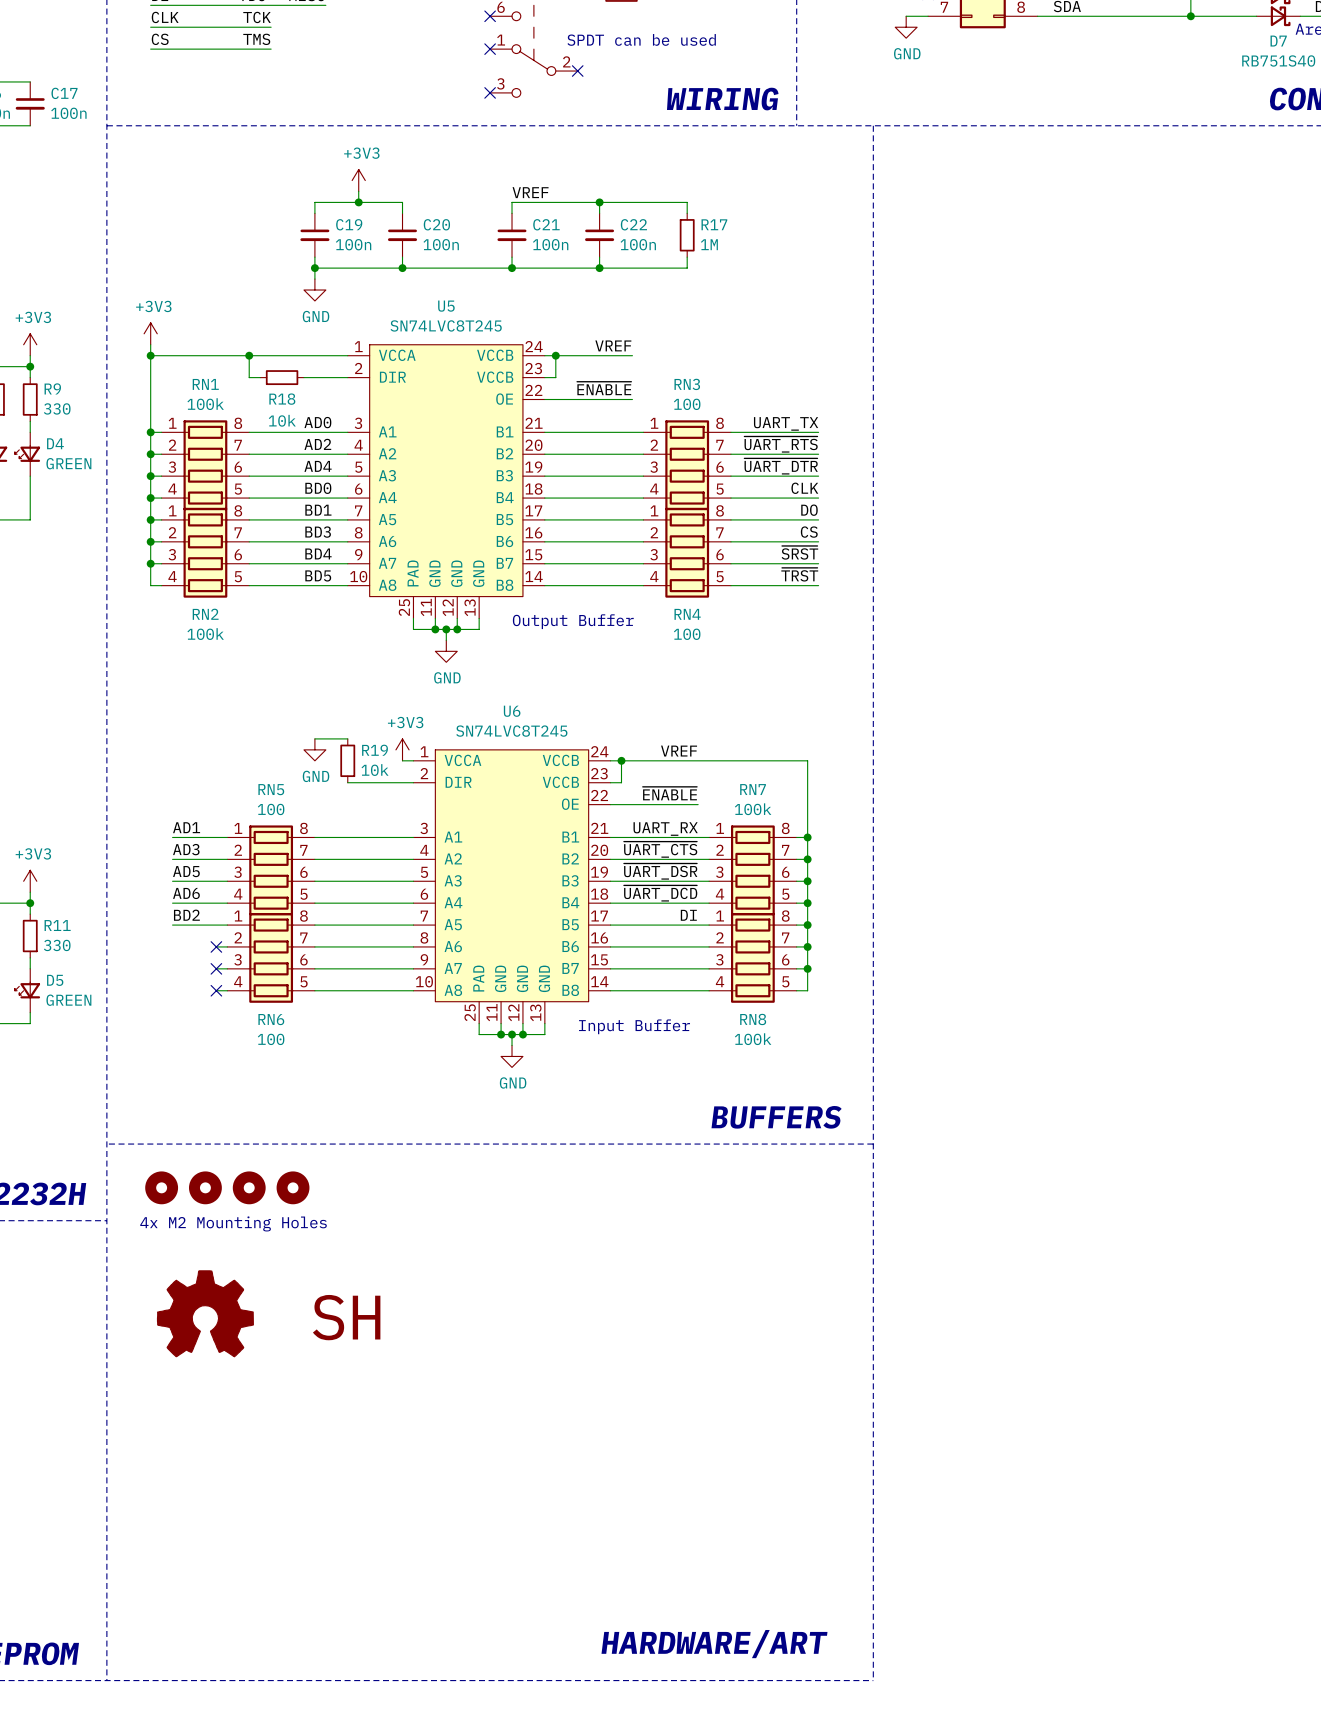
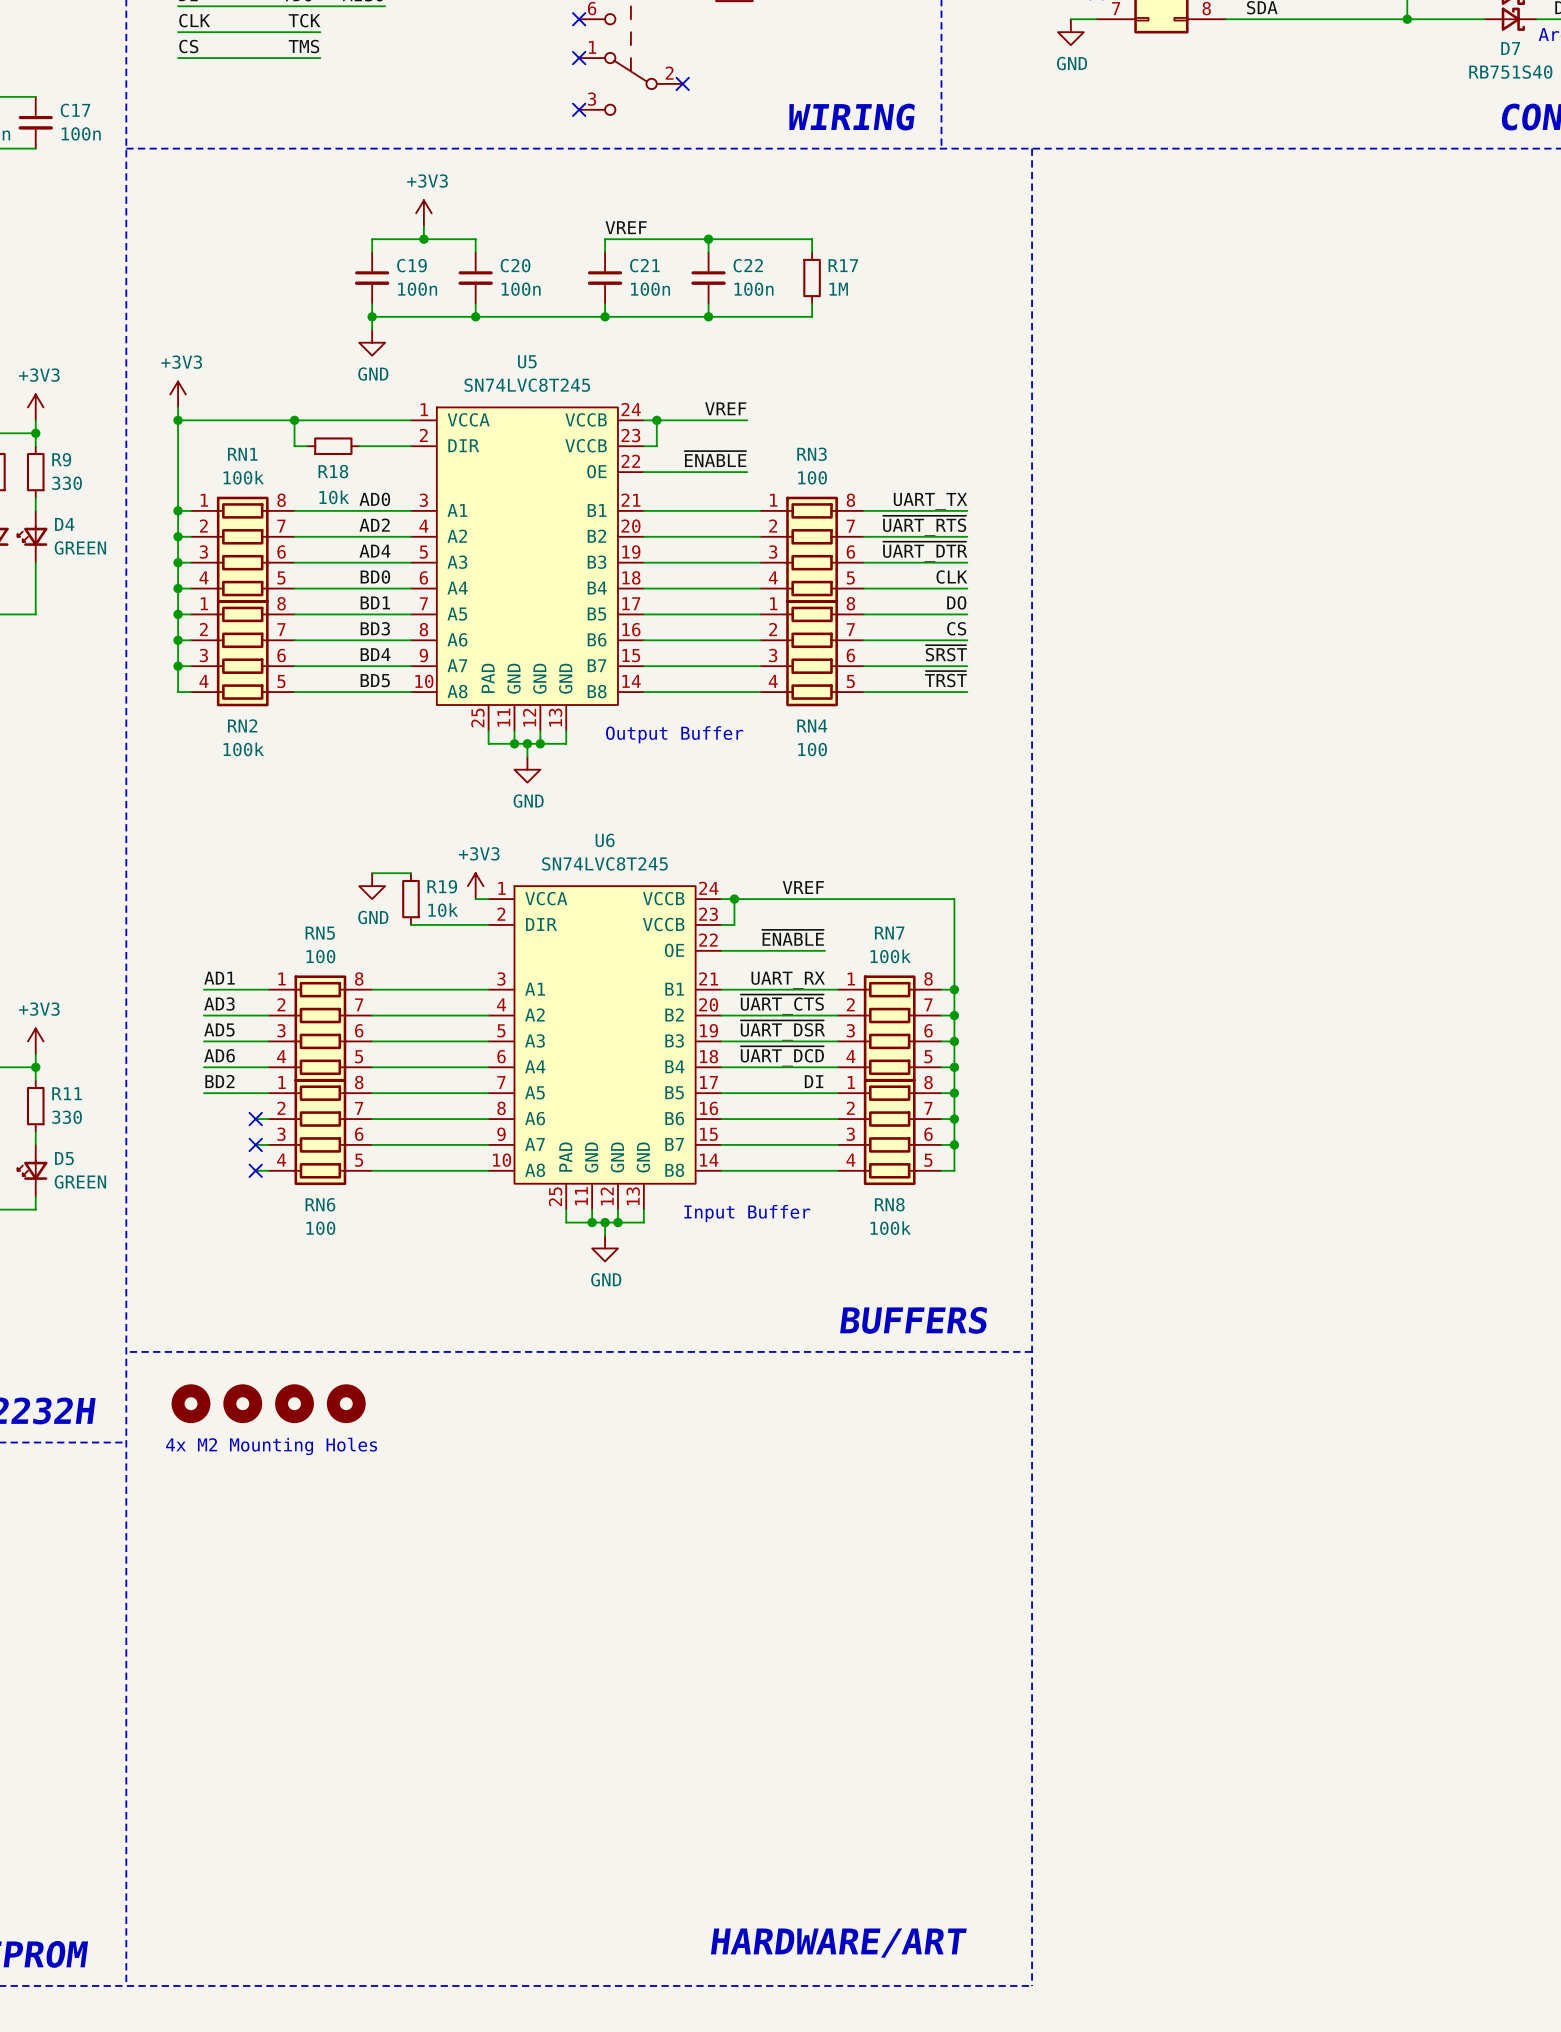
text: SPDT can be used (641, 39) -> none
power symbol: (205, 1313) -> none
power symbol: (346, 1317) -> none

